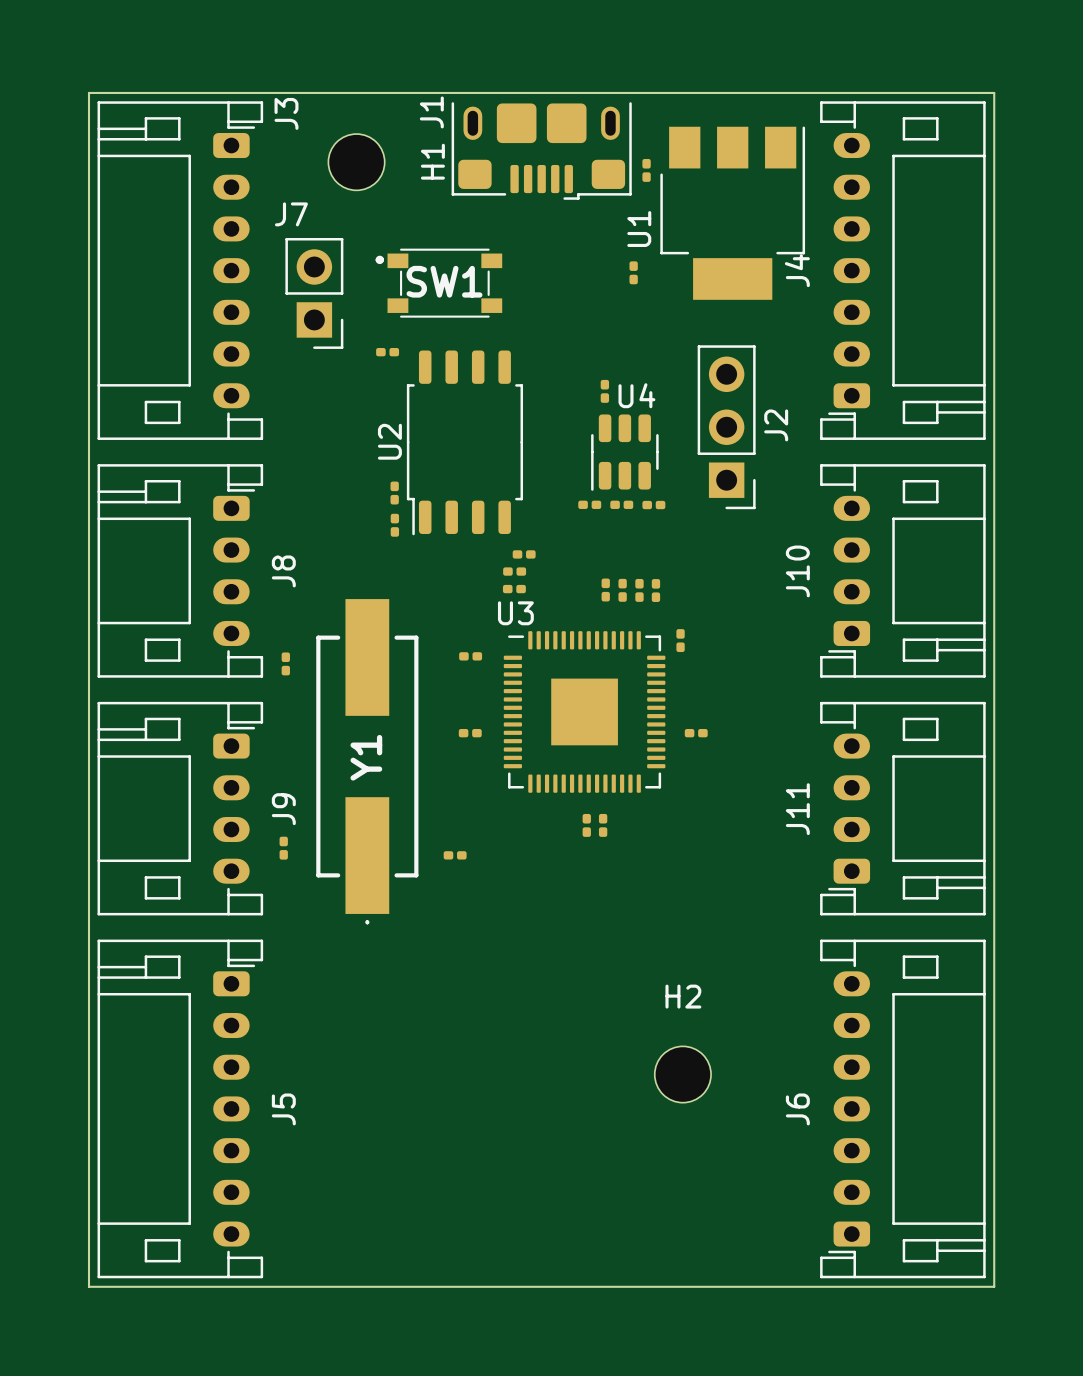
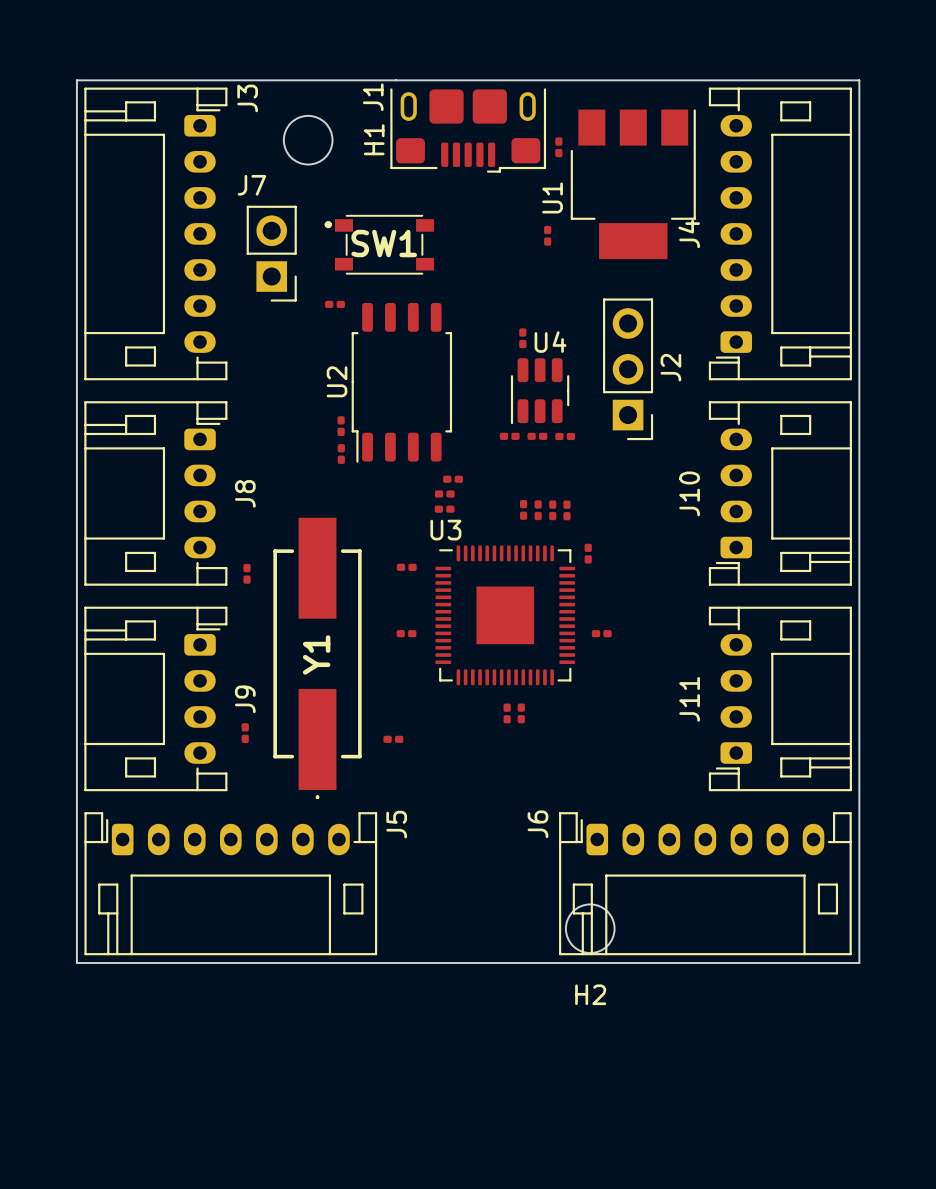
H2 name position: H2 (683, 996) -> H2 (590, 994)
J5 rotation: 0° (180, 1108) -> 90° counterclockwise (230, 883)
J6 rotation: 0° (902, 1108) -> 90° clockwise (705, 883)
J5 name position: J5 (283, 1109) -> J5 (396, 824)
J6 name position: J6 (797, 1109) -> J6 (537, 824)
board edge: (89, 1114) (89, 1286) (994, 1286) (994, 1114) -> (76, 962) (859, 962)

